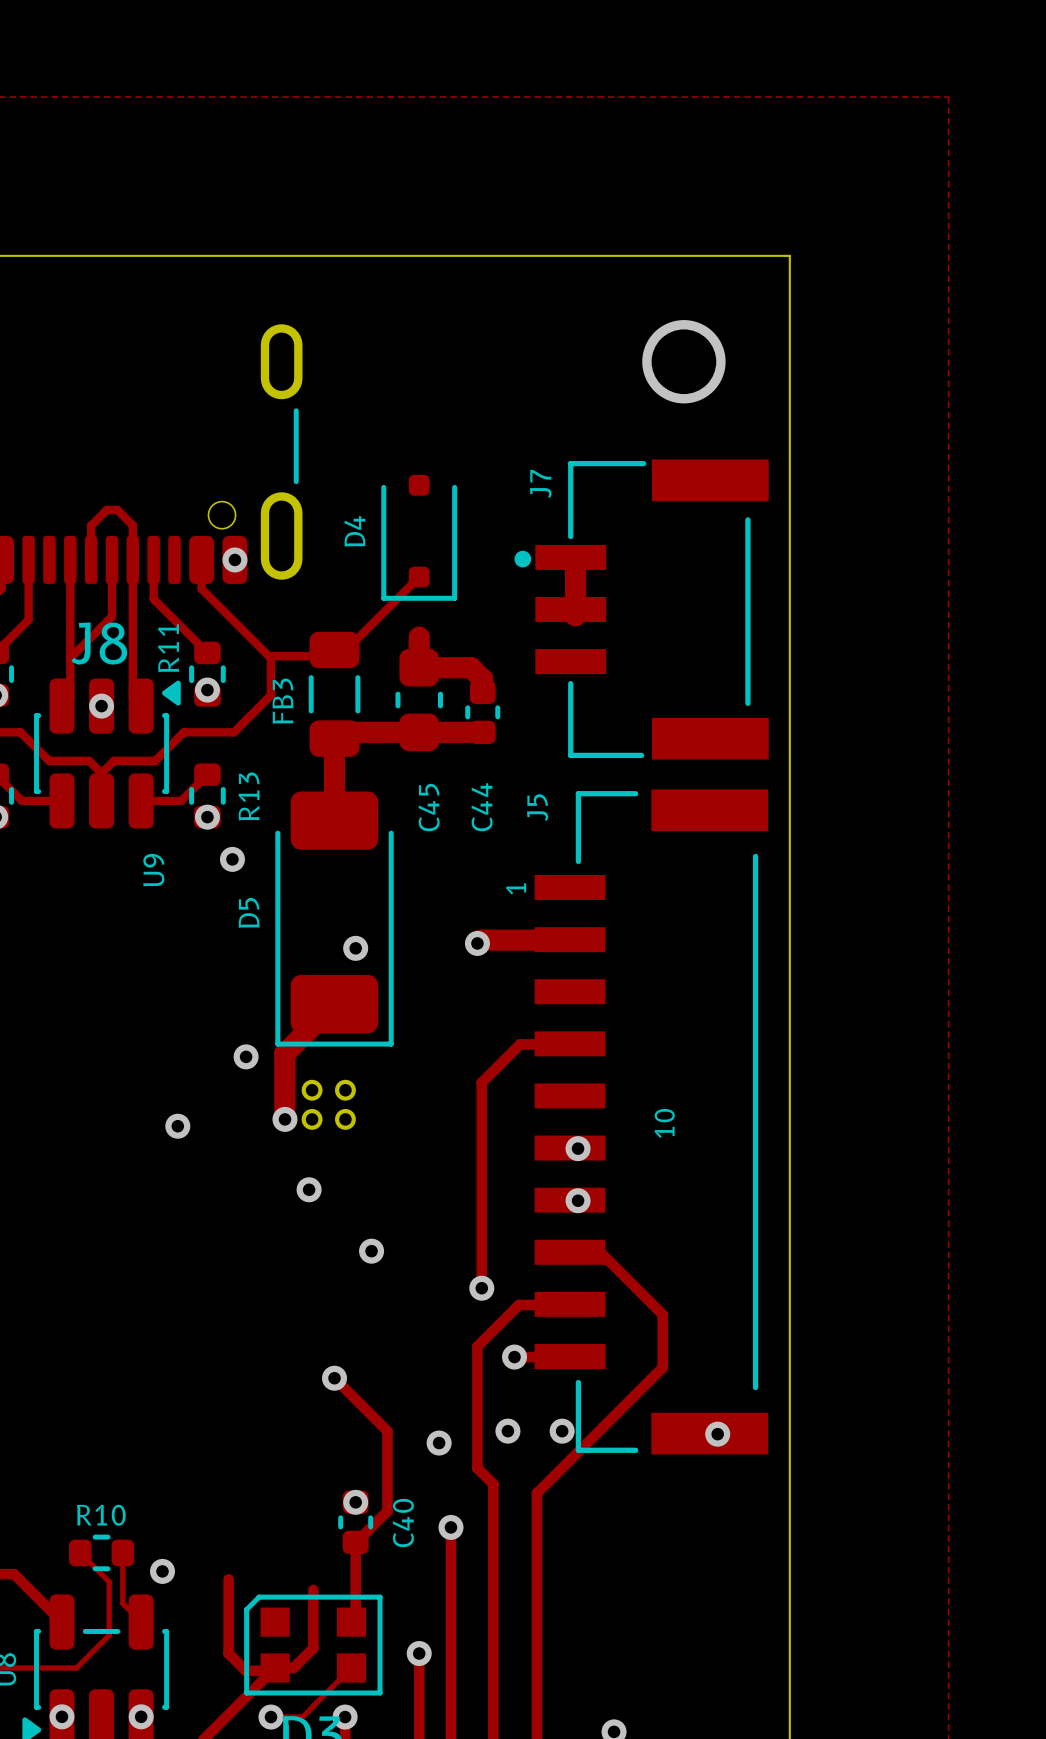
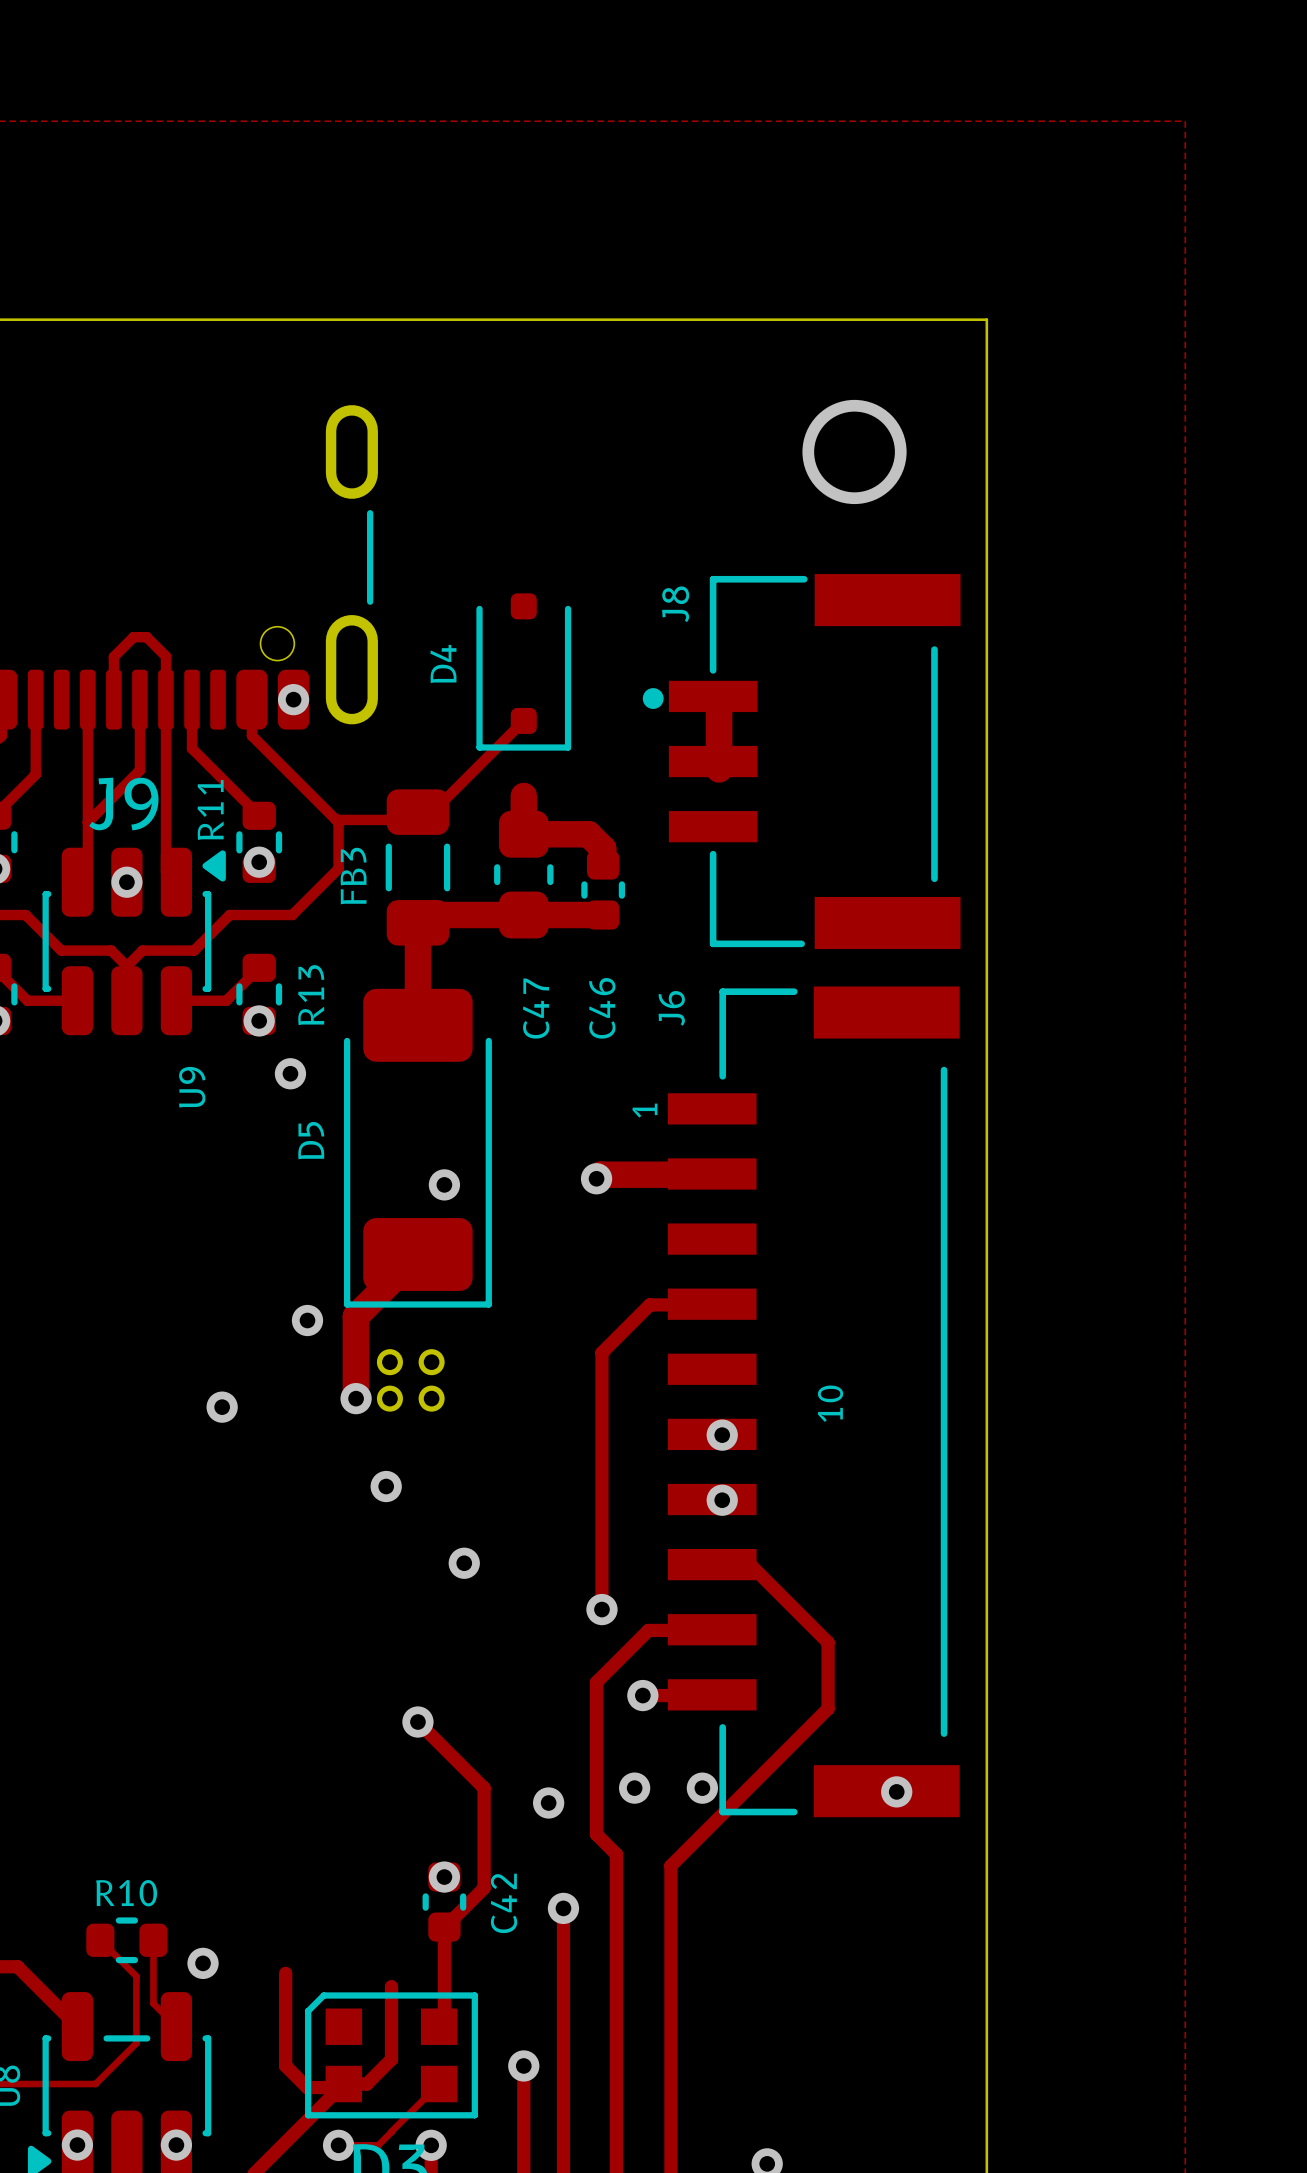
J7 name: J7 (540, 483) -> J8 (675, 604)
J8 name: J8 (99, 643) -> J9 (123, 803)
C45 name: C45 (429, 807) -> C47 (536, 1008)
C44 name: C44 (482, 807) -> C46 (602, 1008)
J5 name: J5 (537, 807) -> J6 (671, 1008)
C40 name: C40 (403, 1523) -> C42 (504, 1903)

